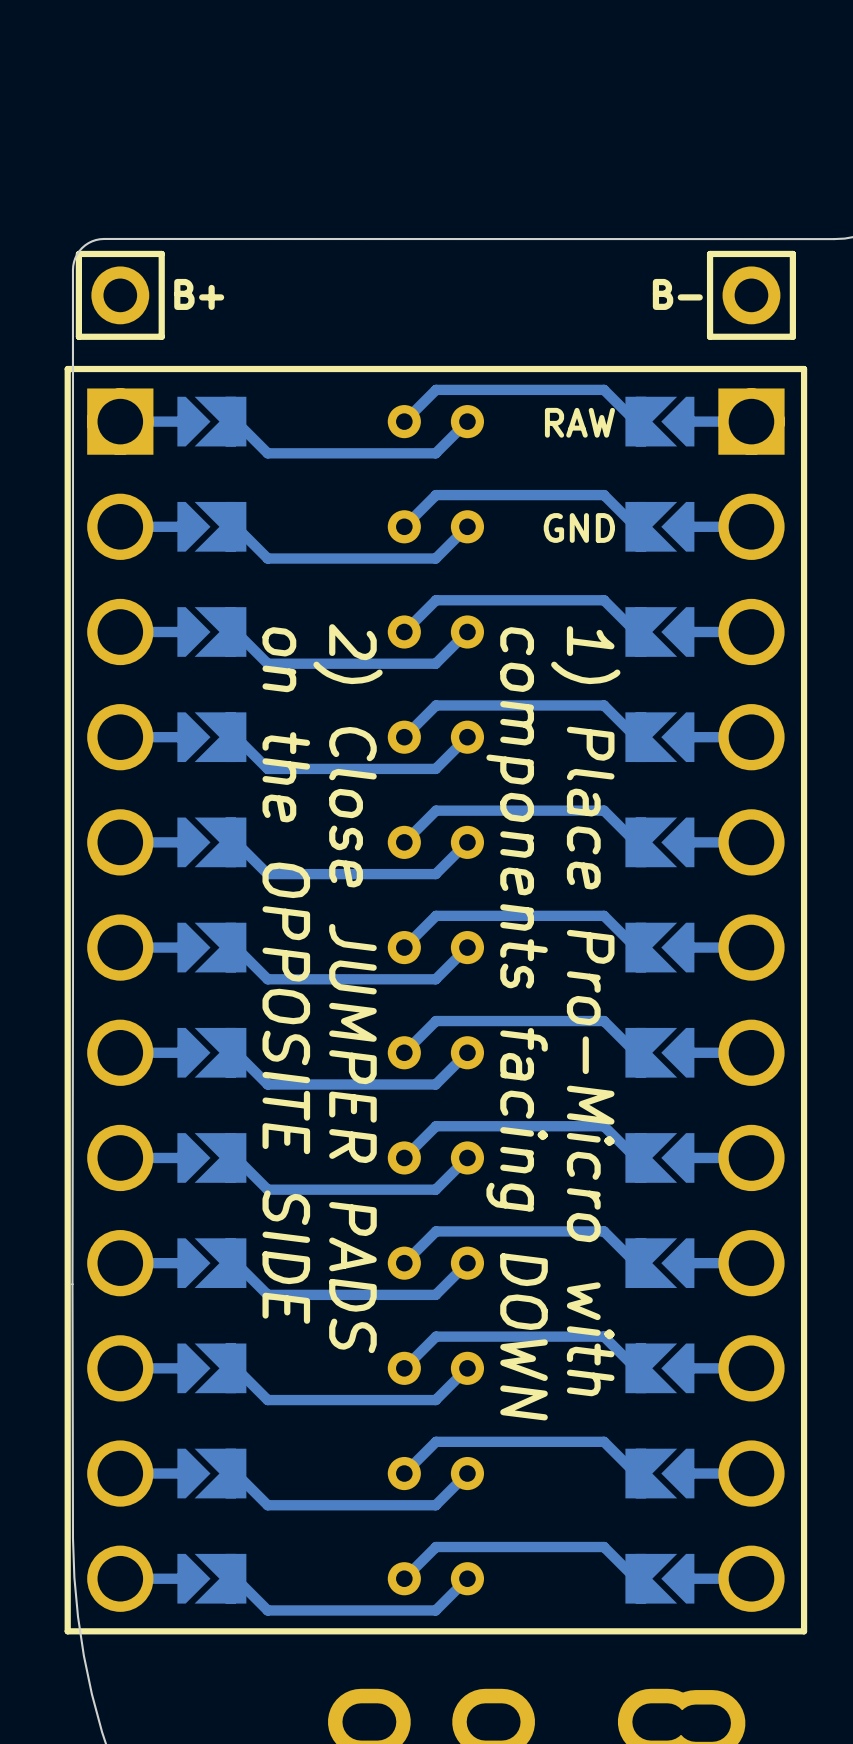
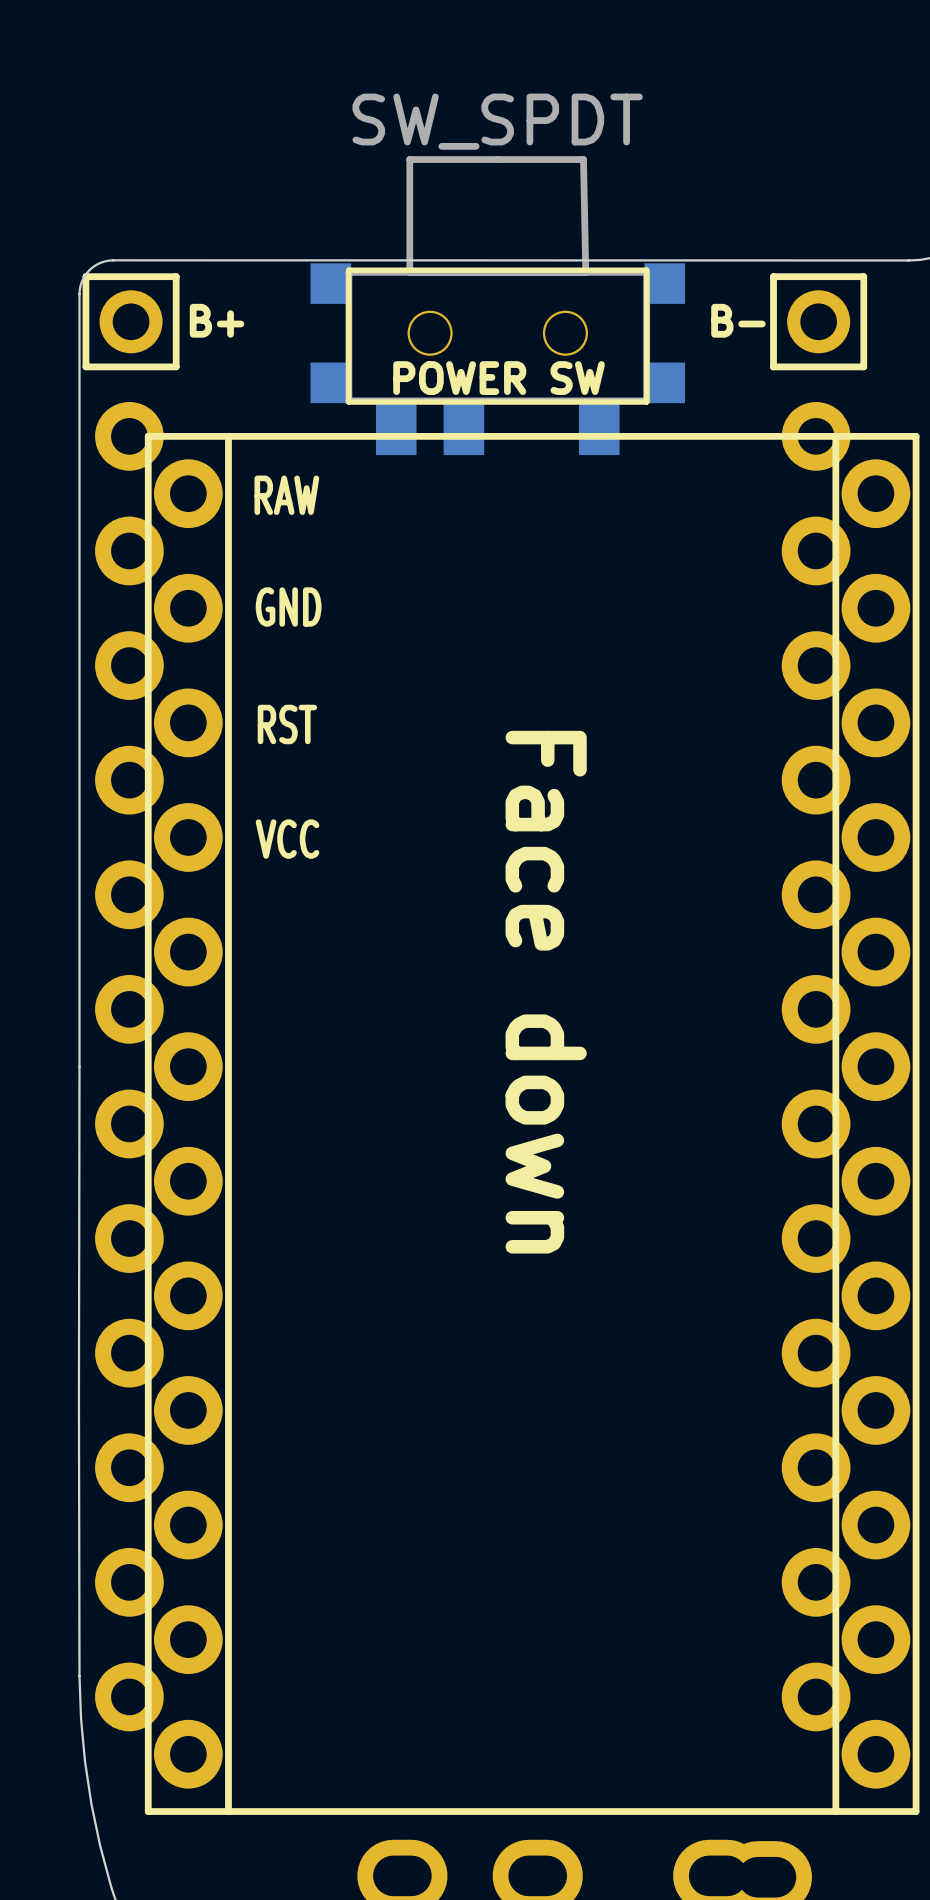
line: none -> (646, 270) (646, 402) (348, 402) (348, 270) (646, 270)
POWER SW: none -> SW_SPDT (497, 305)
part footprint: [64, 365, 808, 1635] -> [95, 402, 920, 1815]
text: RAW (579, 422) -> none
text: GND (579, 527) -> none
text: none -> Face down (546, 992)
text: on the OPPOSITE SIDE (286, 975) -> none
text: 2) Close JUMPER PADS (348, 988) -> none
text: 1) Place Pro-Micro with (585, 1011) -> none
text: components facing DOWN (517, 1023) -> none

